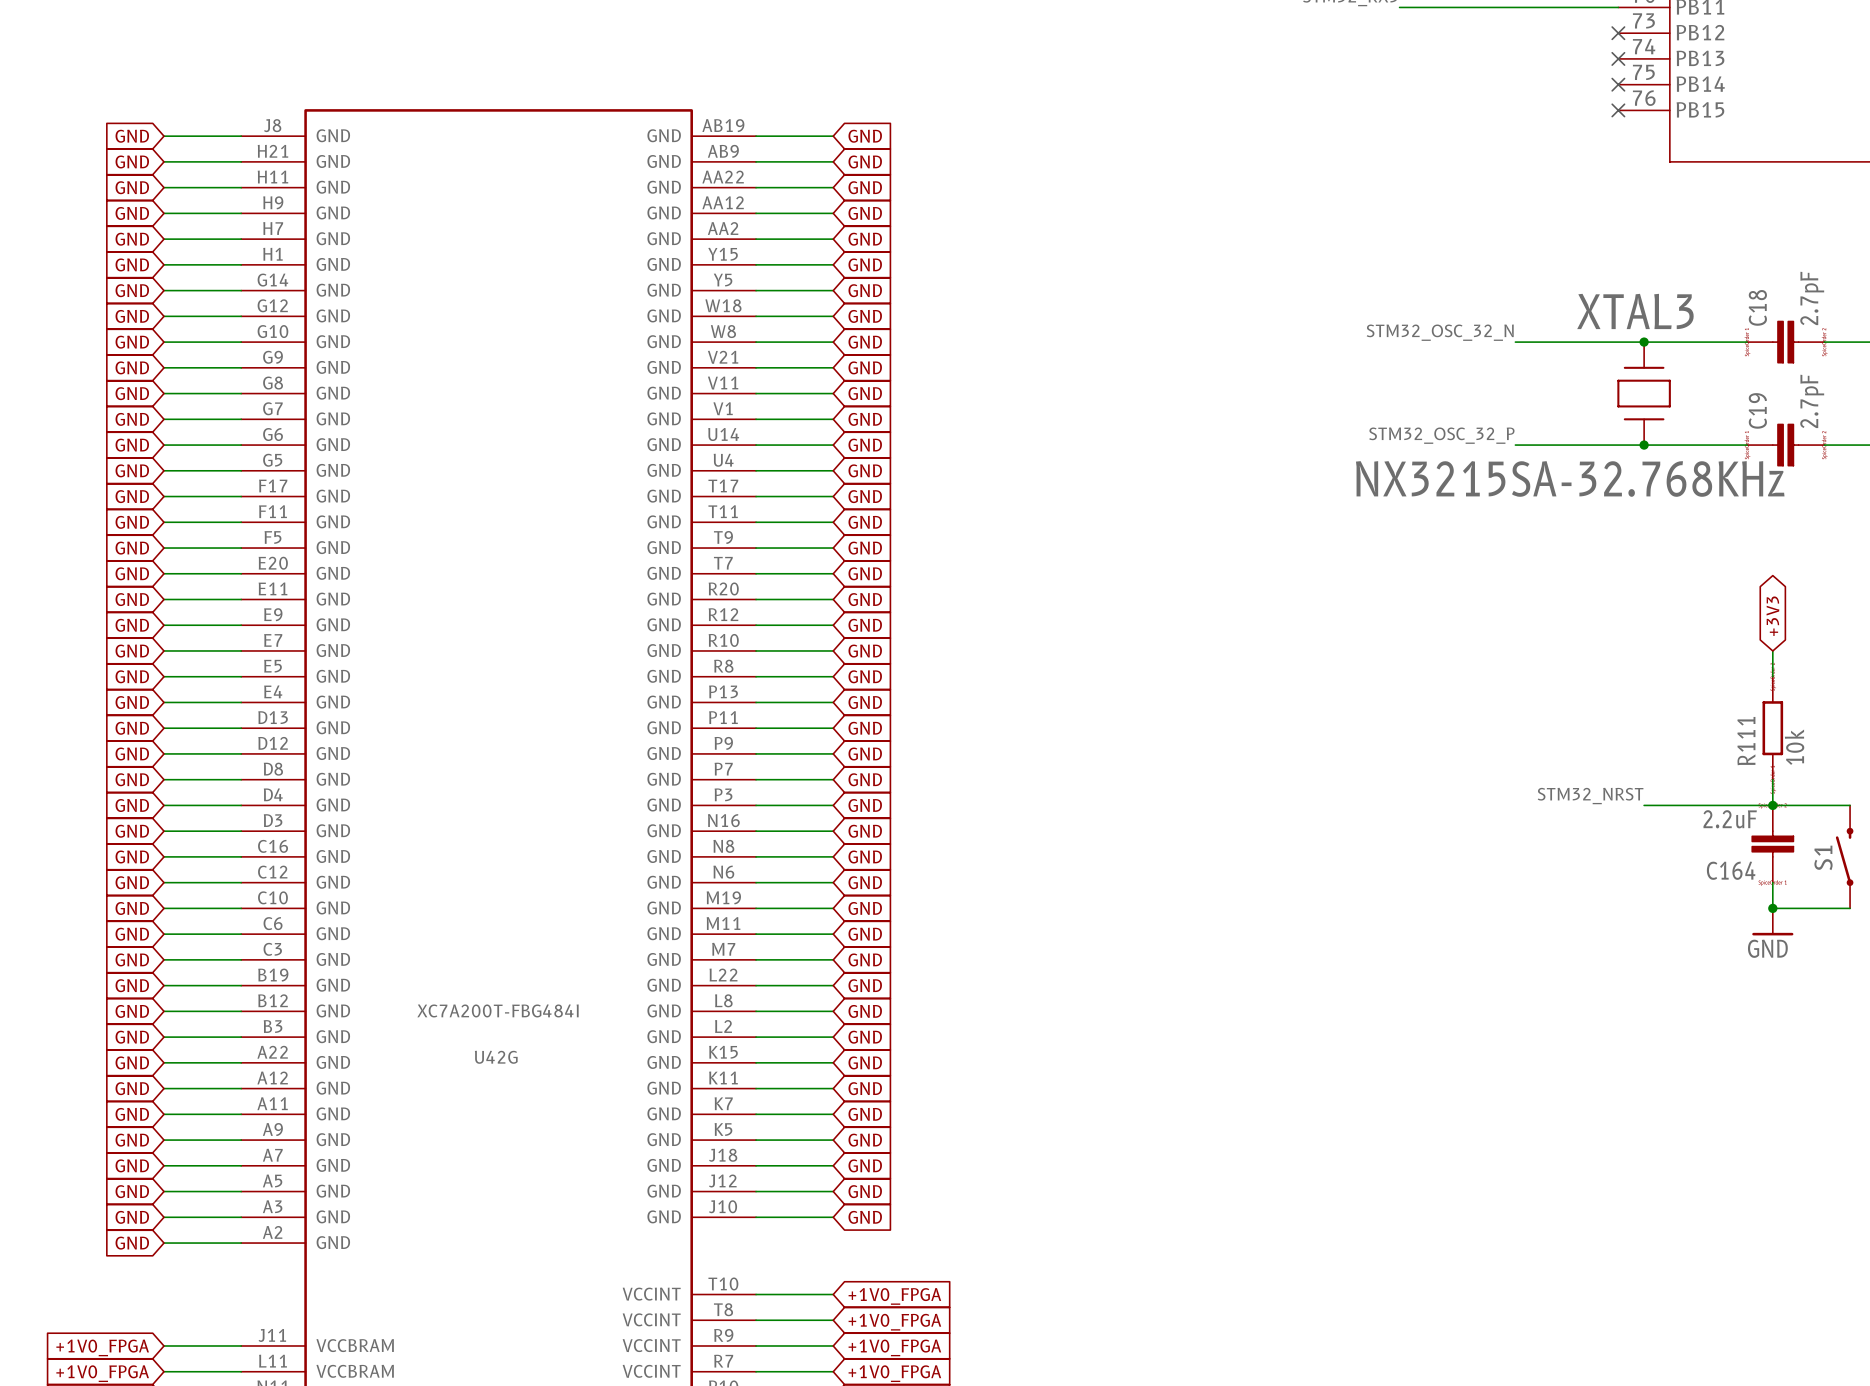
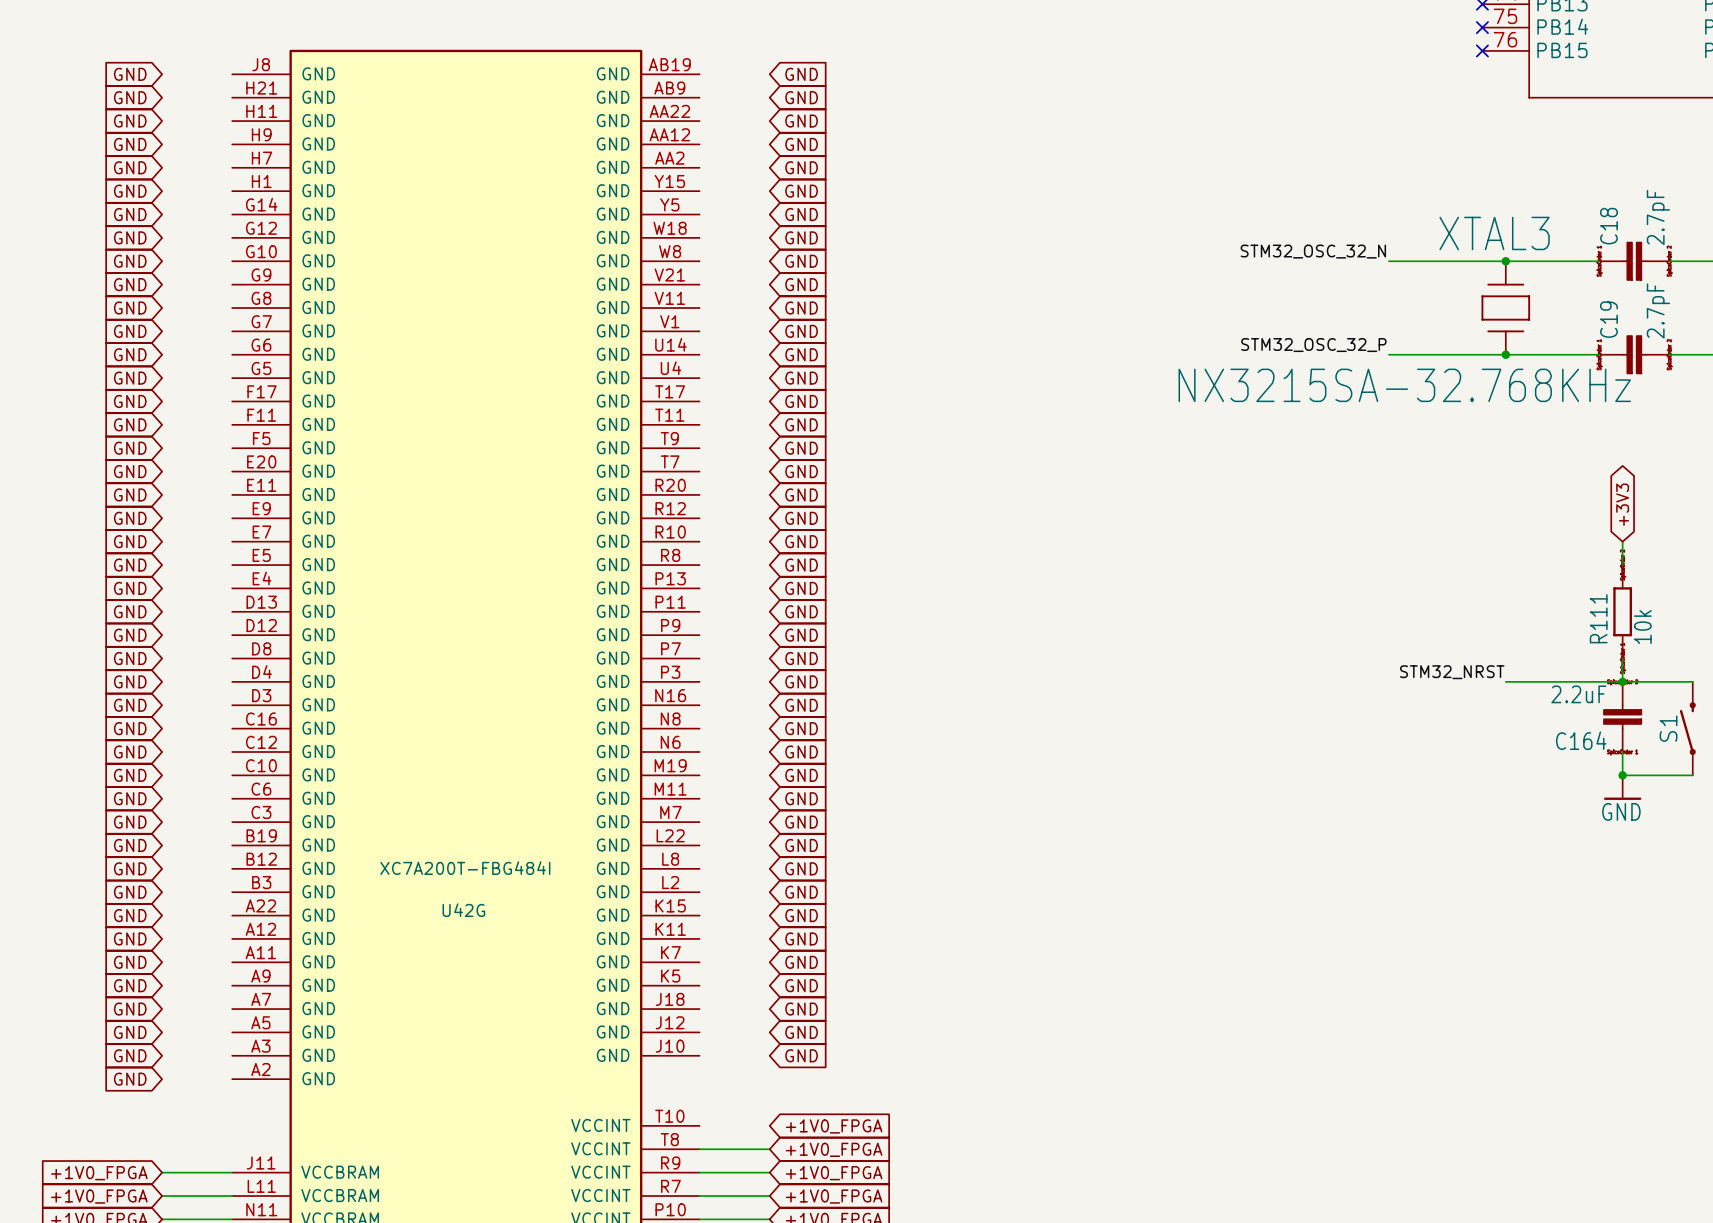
wire: (163, 136) (241, 136) -> none
wire: (756, 136) (833, 136) -> none
wire: (163, 161) (241, 161) -> none
wire: (756, 161) (833, 161) -> none
wire: (163, 187) (241, 187) -> none
wire: (756, 187) (833, 187) -> none
wire: (163, 213) (241, 213) -> none
wire: (756, 213) (833, 213) -> none
wire: (163, 239) (241, 239) -> none
wire: (756, 239) (833, 239) -> none
wire: (163, 264) (241, 264) -> none
wire: (756, 264) (833, 264) -> none
wire: (163, 290) (241, 290) -> none
wire: (756, 290) (833, 290) -> none
wire: (163, 316) (241, 316) -> none
wire: (756, 316) (833, 316) -> none
wire: (163, 342) (241, 342) -> none
wire: (756, 342) (833, 342) -> none
wire: (163, 367) (241, 367) -> none
wire: (756, 367) (833, 367) -> none
wire: (163, 393) (241, 393) -> none
wire: (756, 393) (833, 393) -> none
wire: (163, 419) (241, 419) -> none
wire: (756, 419) (833, 419) -> none
wire: (163, 445) (241, 445) -> none
wire: (756, 445) (833, 445) -> none
wire: (163, 470) (241, 470) -> none
wire: (756, 470) (833, 470) -> none
wire: (163, 496) (241, 496) -> none
wire: (756, 496) (833, 496) -> none
wire: (163, 522) (241, 522) -> none
wire: (756, 522) (833, 522) -> none
wire: (163, 548) (241, 548) -> none
wire: (756, 548) (833, 548) -> none
wire: (163, 573) (241, 573) -> none
wire: (756, 573) (833, 573) -> none
wire: (163, 599) (241, 599) -> none
wire: (756, 599) (833, 599) -> none
wire: (163, 625) (241, 625) -> none
wire: (756, 625) (833, 625) -> none
wire: (163, 650) (241, 650) -> none
wire: (756, 650) (833, 650) -> none
wire: (163, 676) (241, 676) -> none
wire: (756, 676) (833, 676) -> none
wire: (163, 702) (241, 702) -> none
wire: (756, 702) (833, 702) -> none
wire: (163, 728) (241, 728) -> none
wire: (756, 728) (833, 728) -> none
wire: (163, 753) (241, 753) -> none
wire: (756, 753) (833, 753) -> none
wire: (163, 779) (241, 779) -> none
wire: (756, 779) (833, 779) -> none
wire: (163, 805) (241, 805) -> none
wire: (756, 805) (833, 805) -> none
wire: (163, 831) (241, 831) -> none
wire: (756, 831) (833, 831) -> none
wire: (163, 856) (241, 856) -> none
wire: (756, 856) (833, 856) -> none
wire: (163, 882) (241, 882) -> none
wire: (756, 882) (833, 882) -> none
wire: (163, 908) (241, 908) -> none
wire: (756, 908) (833, 908) -> none
wire: (163, 934) (241, 934) -> none
wire: (756, 934) (833, 934) -> none
wire: (163, 959) (241, 959) -> none
wire: (756, 959) (833, 959) -> none
wire: (163, 985) (241, 985) -> none
wire: (756, 985) (833, 985) -> none
wire: (163, 1011) (241, 1011) -> none
wire: (756, 1011) (833, 1011) -> none
wire: (163, 1037) (241, 1037) -> none
wire: (756, 1037) (833, 1037) -> none
wire: (163, 1062) (241, 1062) -> none
wire: (756, 1062) (833, 1062) -> none
wire: (163, 1088) (241, 1088) -> none
wire: (756, 1088) (833, 1088) -> none
wire: (163, 1114) (241, 1114) -> none
wire: (756, 1114) (833, 1114) -> none
wire: (163, 1140) (241, 1140) -> none
wire: (756, 1140) (833, 1140) -> none
wire: (163, 1165) (241, 1165) -> none
wire: (756, 1165) (833, 1165) -> none
wire: (163, 1191) (241, 1191) -> none
wire: (756, 1191) (833, 1191) -> none
wire: (163, 1217) (241, 1217) -> none
wire: (756, 1217) (833, 1217) -> none
wire: (163, 1243) (241, 1243) -> none
wire: (756, 1294) (833, 1294) -> none

